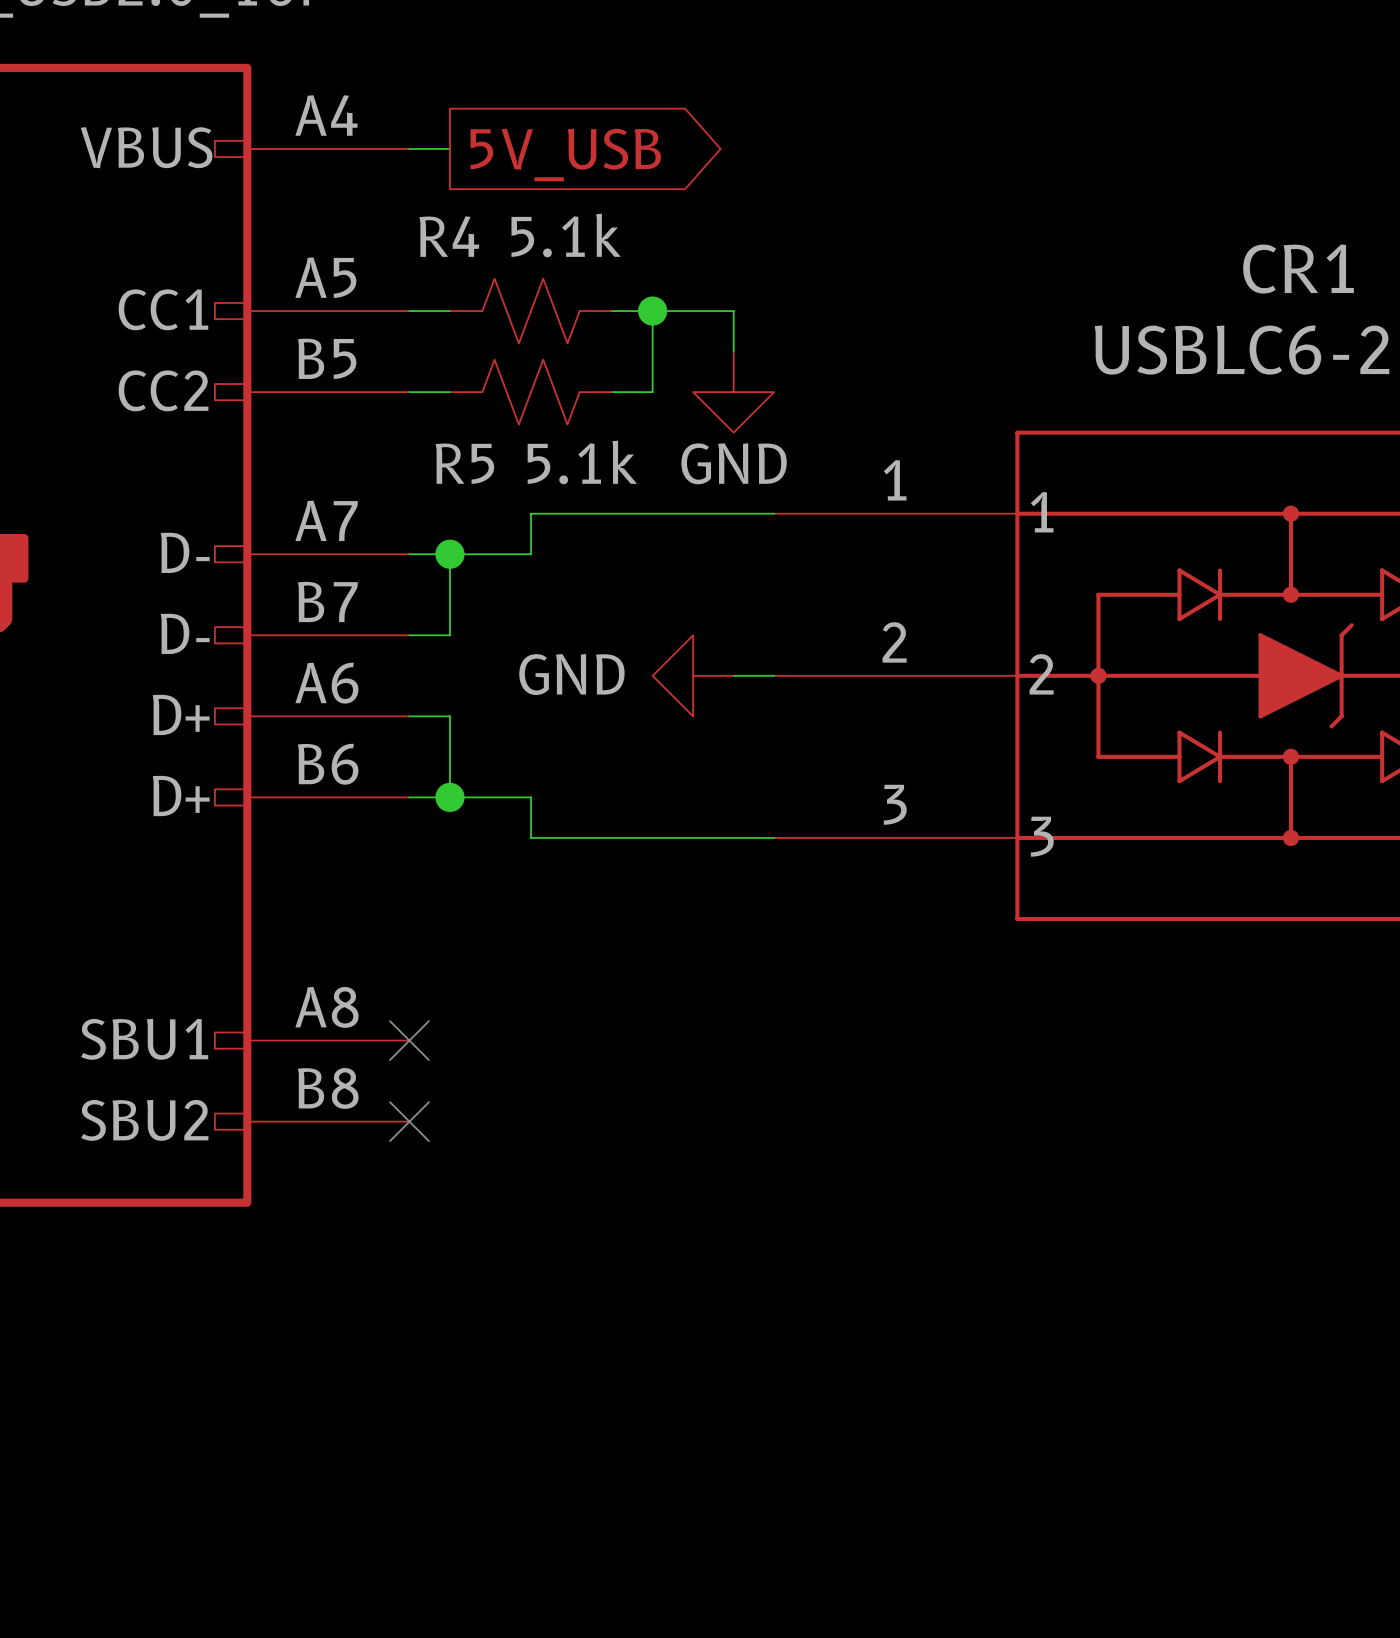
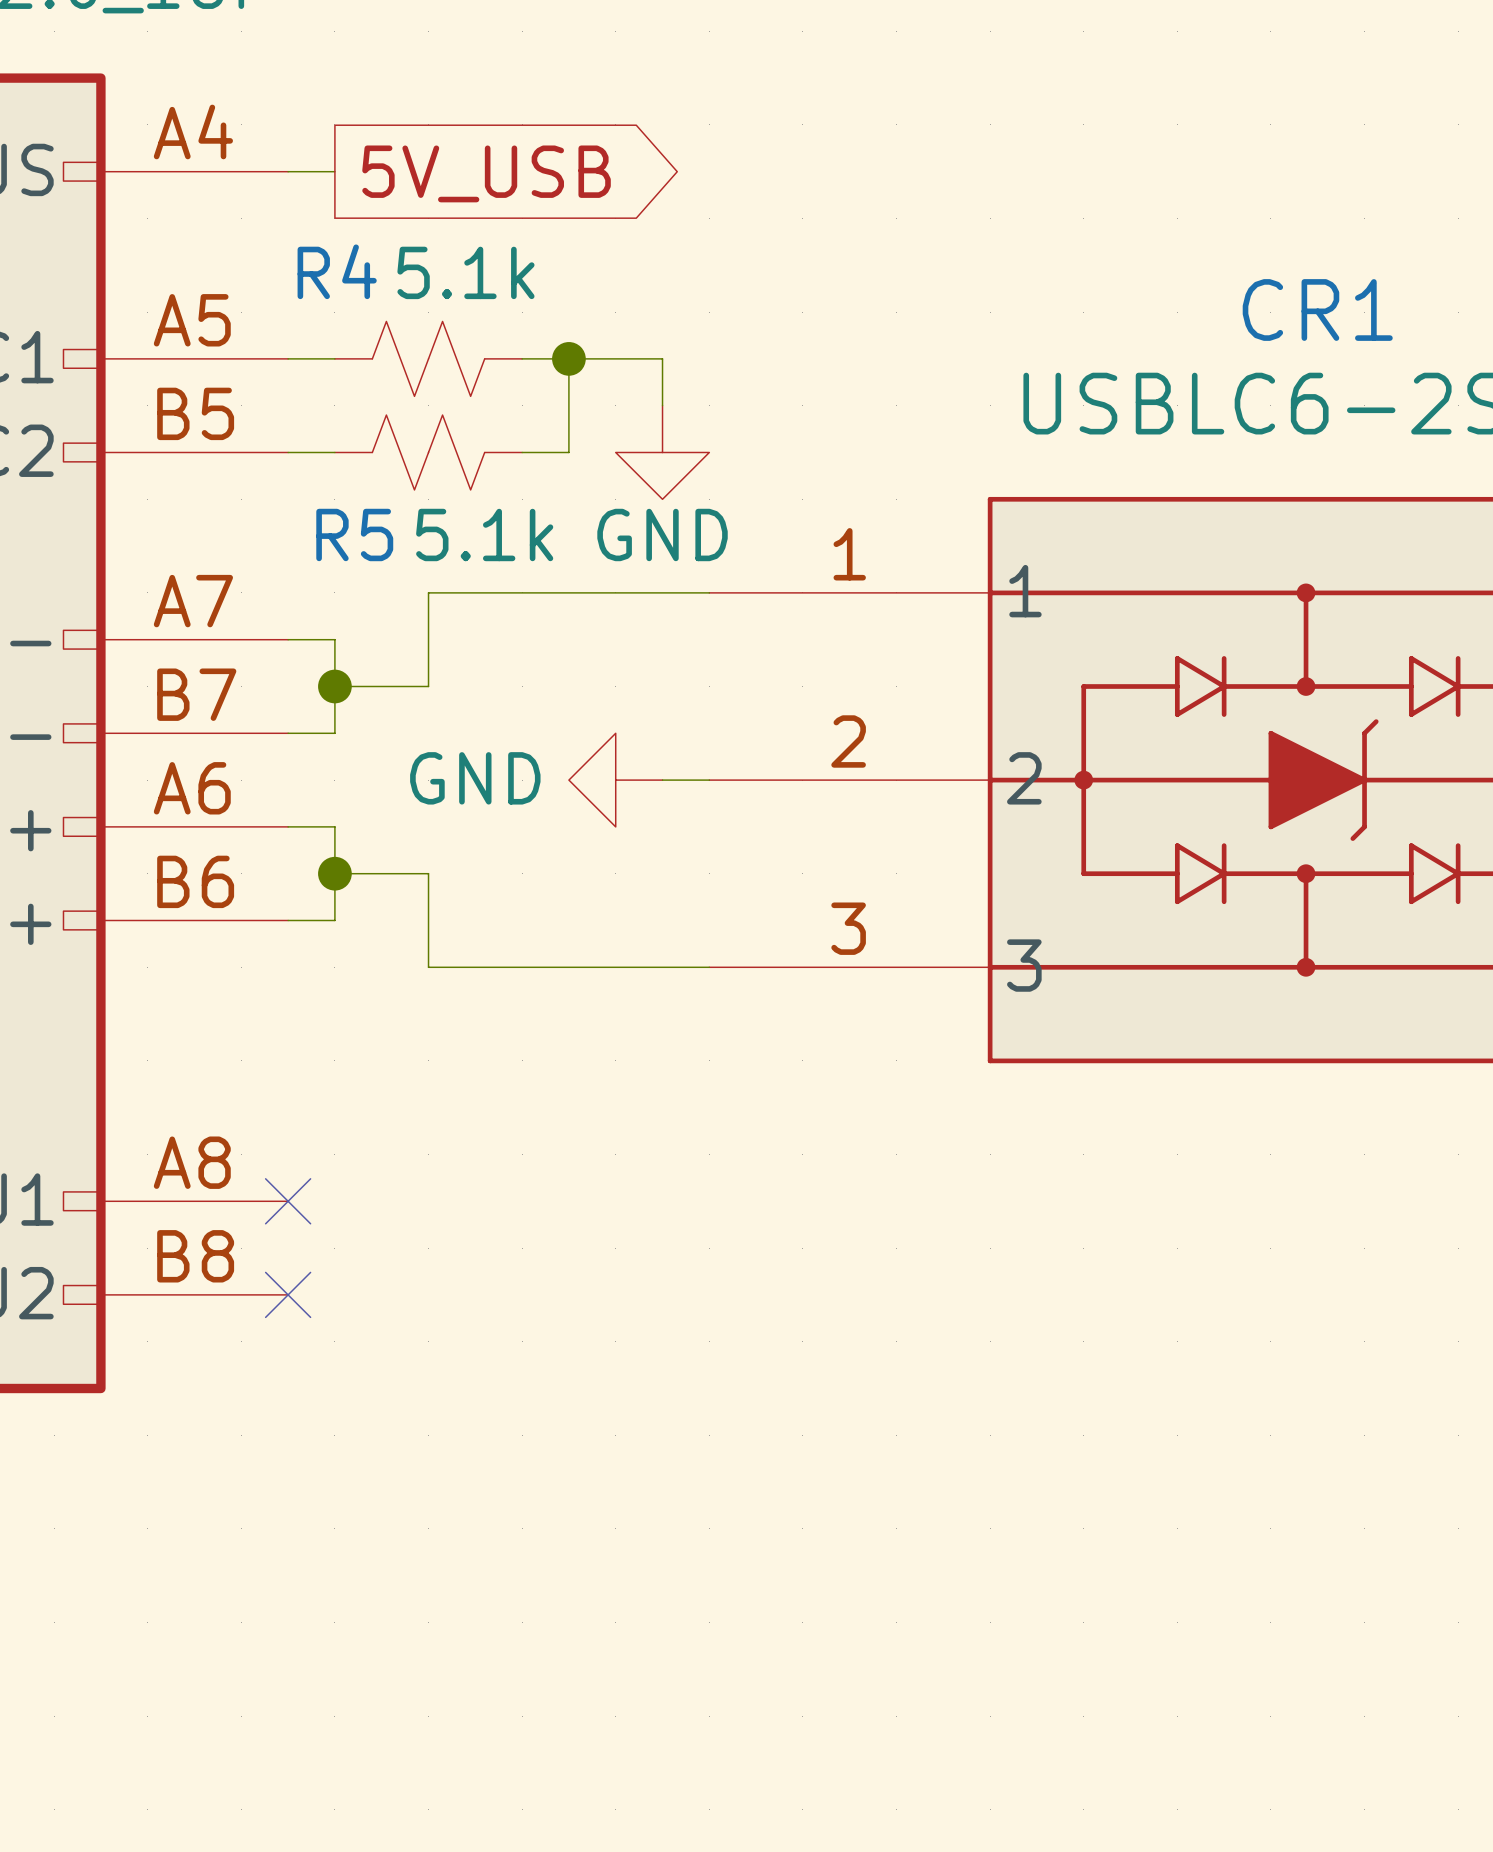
wire: (449, 554) (531, 554) -> (334, 686) (428, 686) (428, 639)
junction position: (449, 554) -> (334, 686)
wire: (449, 797) (531, 797) -> (334, 873) (428, 873) (428, 920)
junction position: (449, 797) -> (334, 873)

